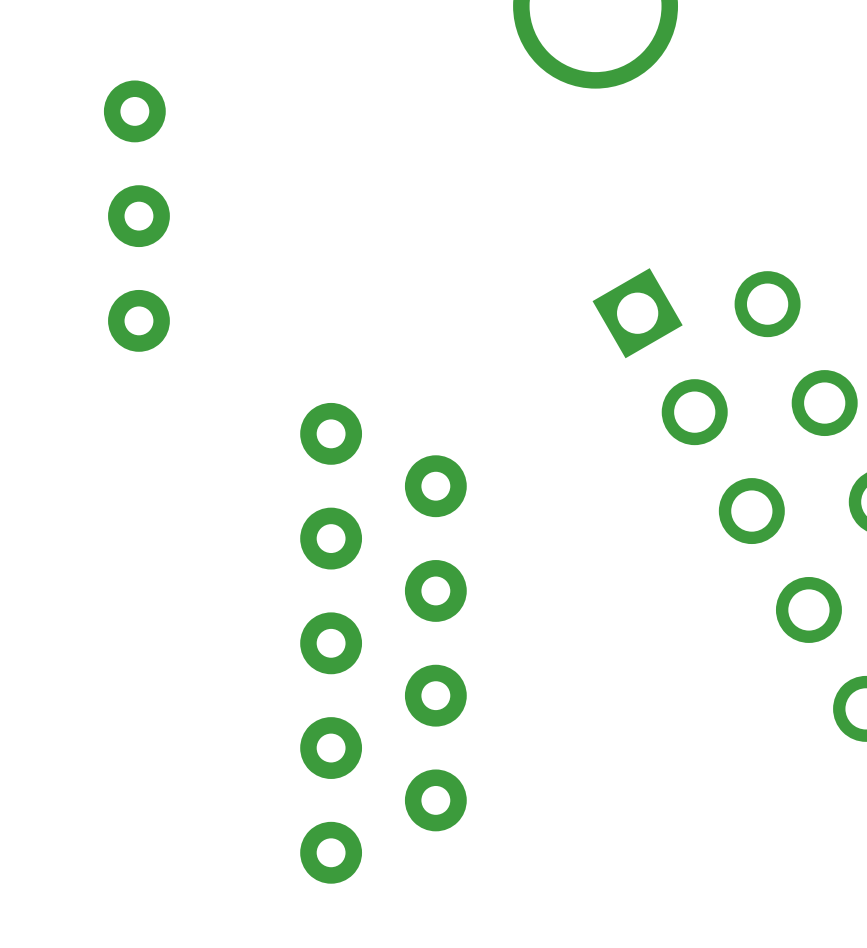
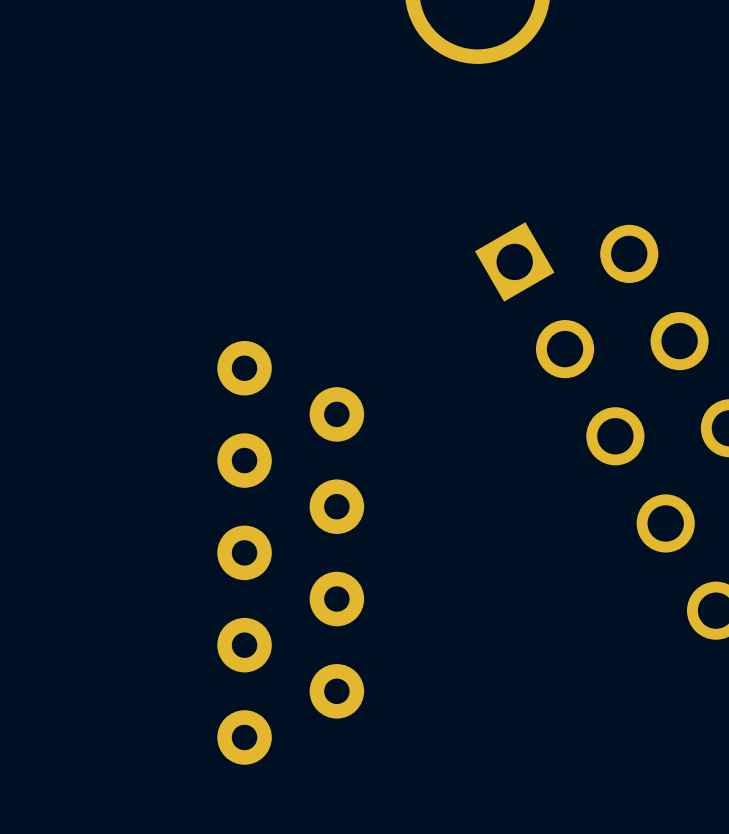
part: (134, 111) -> none
part: (138, 216) -> none
part: (138, 320) -> none

